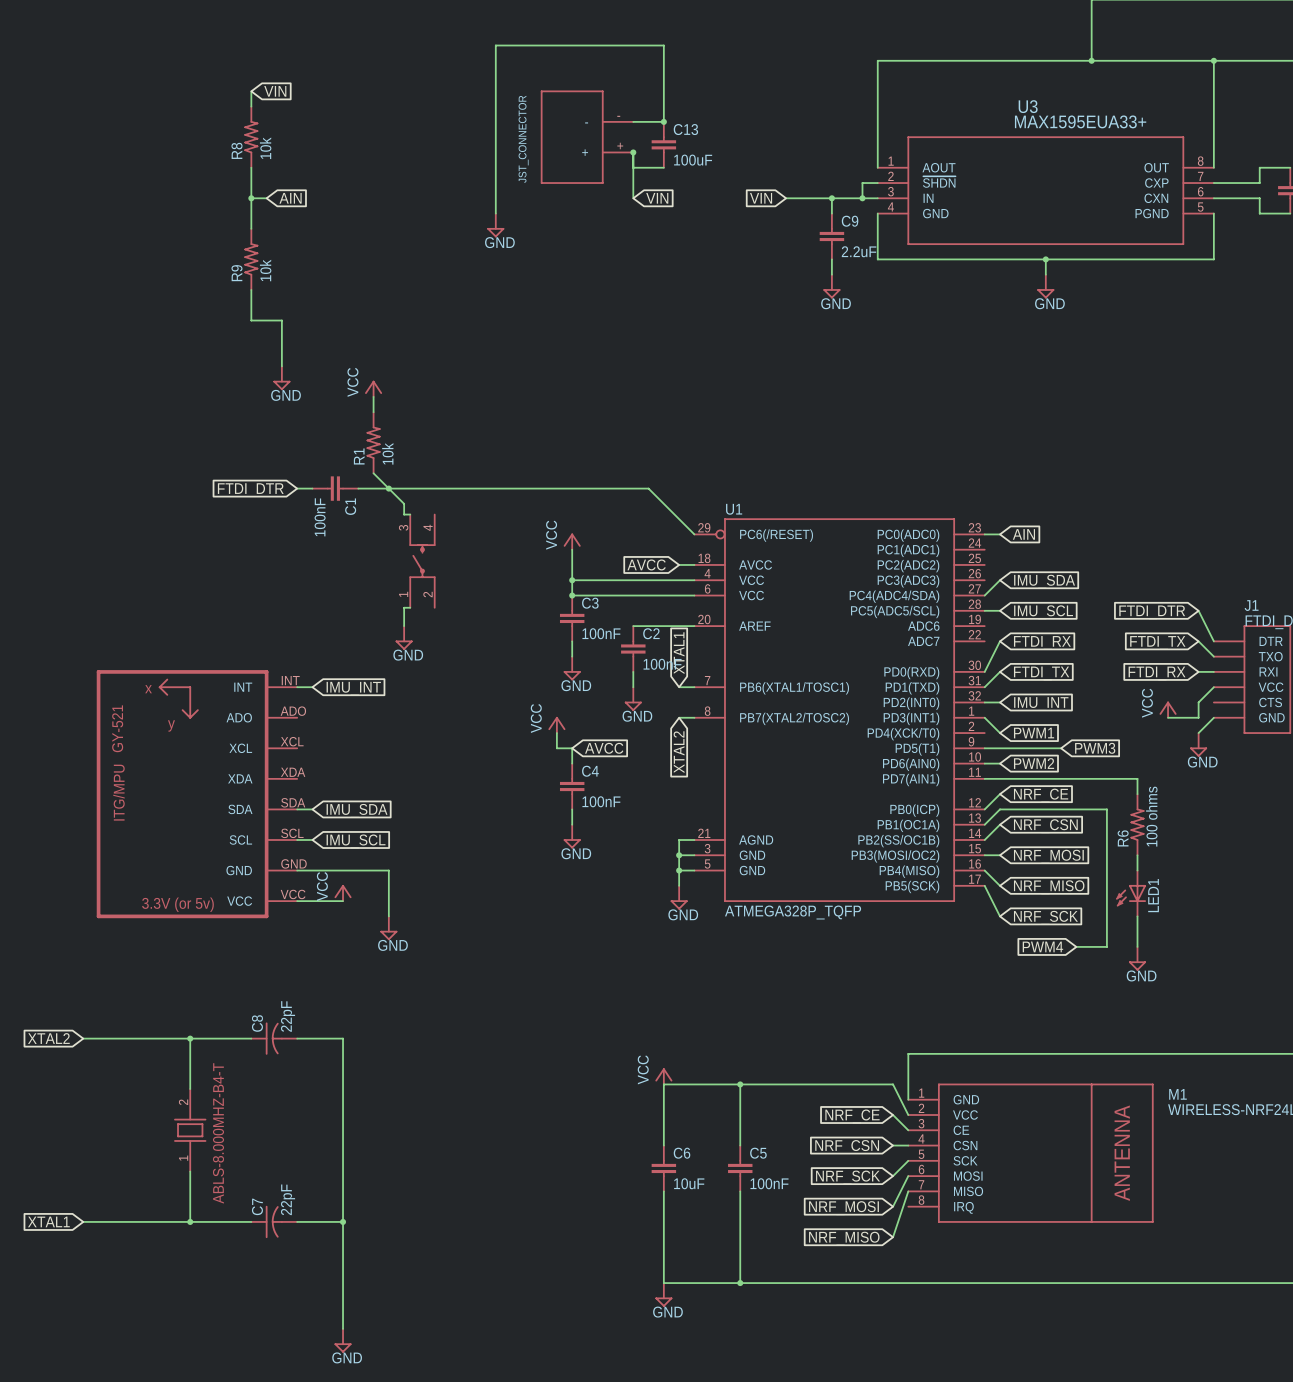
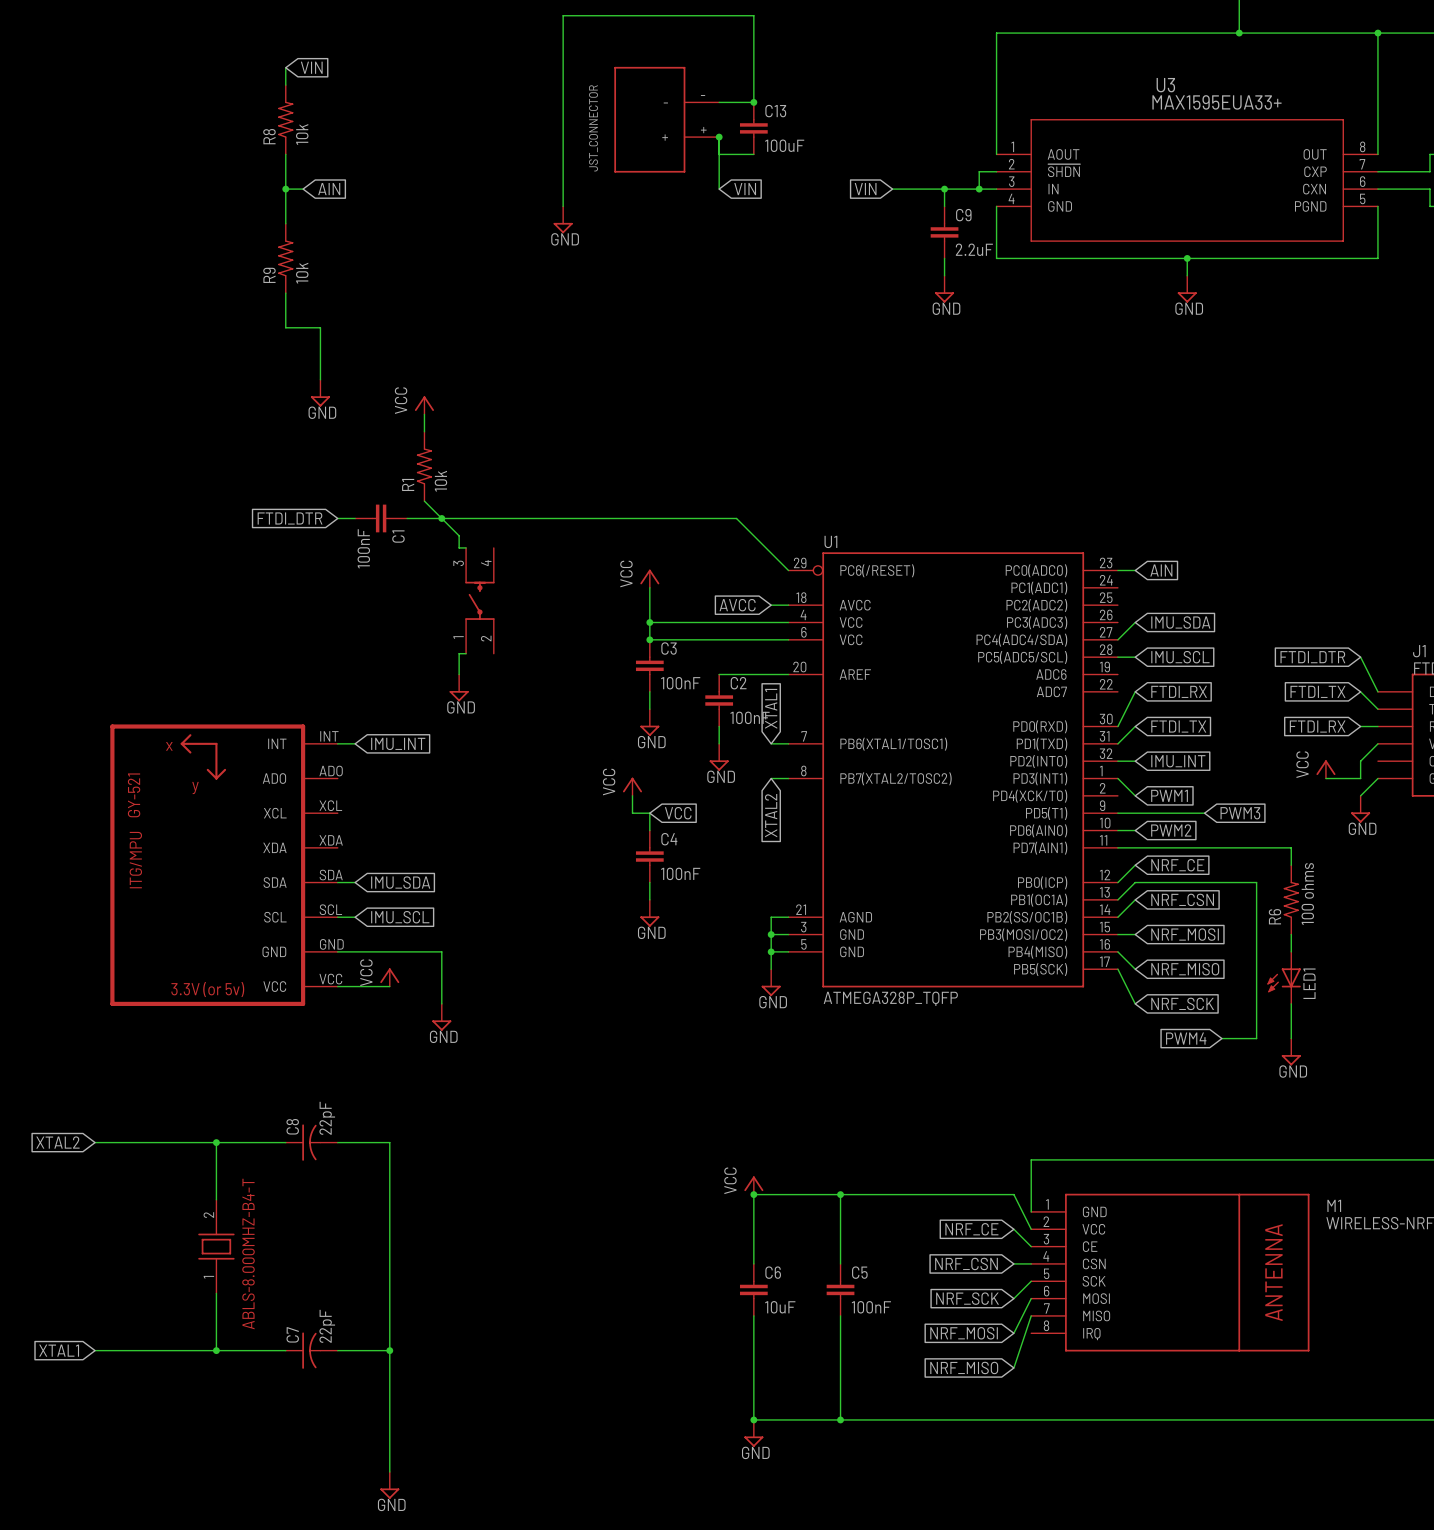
global label: AVCC (604, 748) -> VCC (678, 813)
junction: none -> (753, 1194)
junction: none -> (753, 1419)

